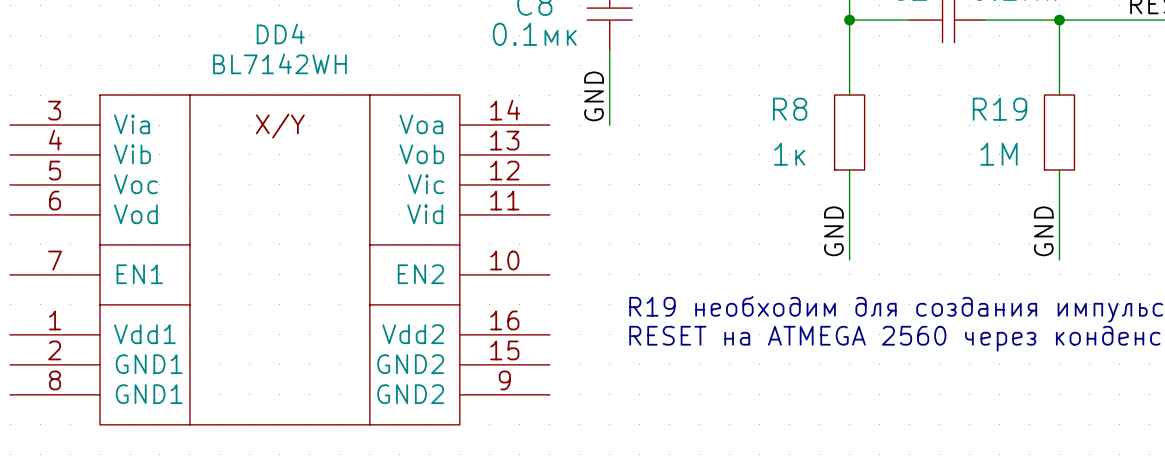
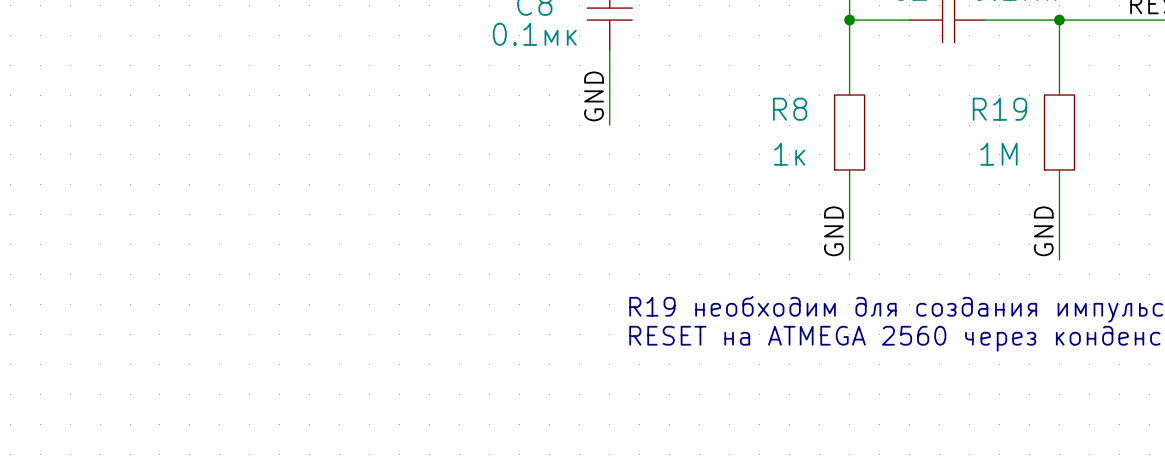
DD4: BL7142WH (279, 259) -> none

